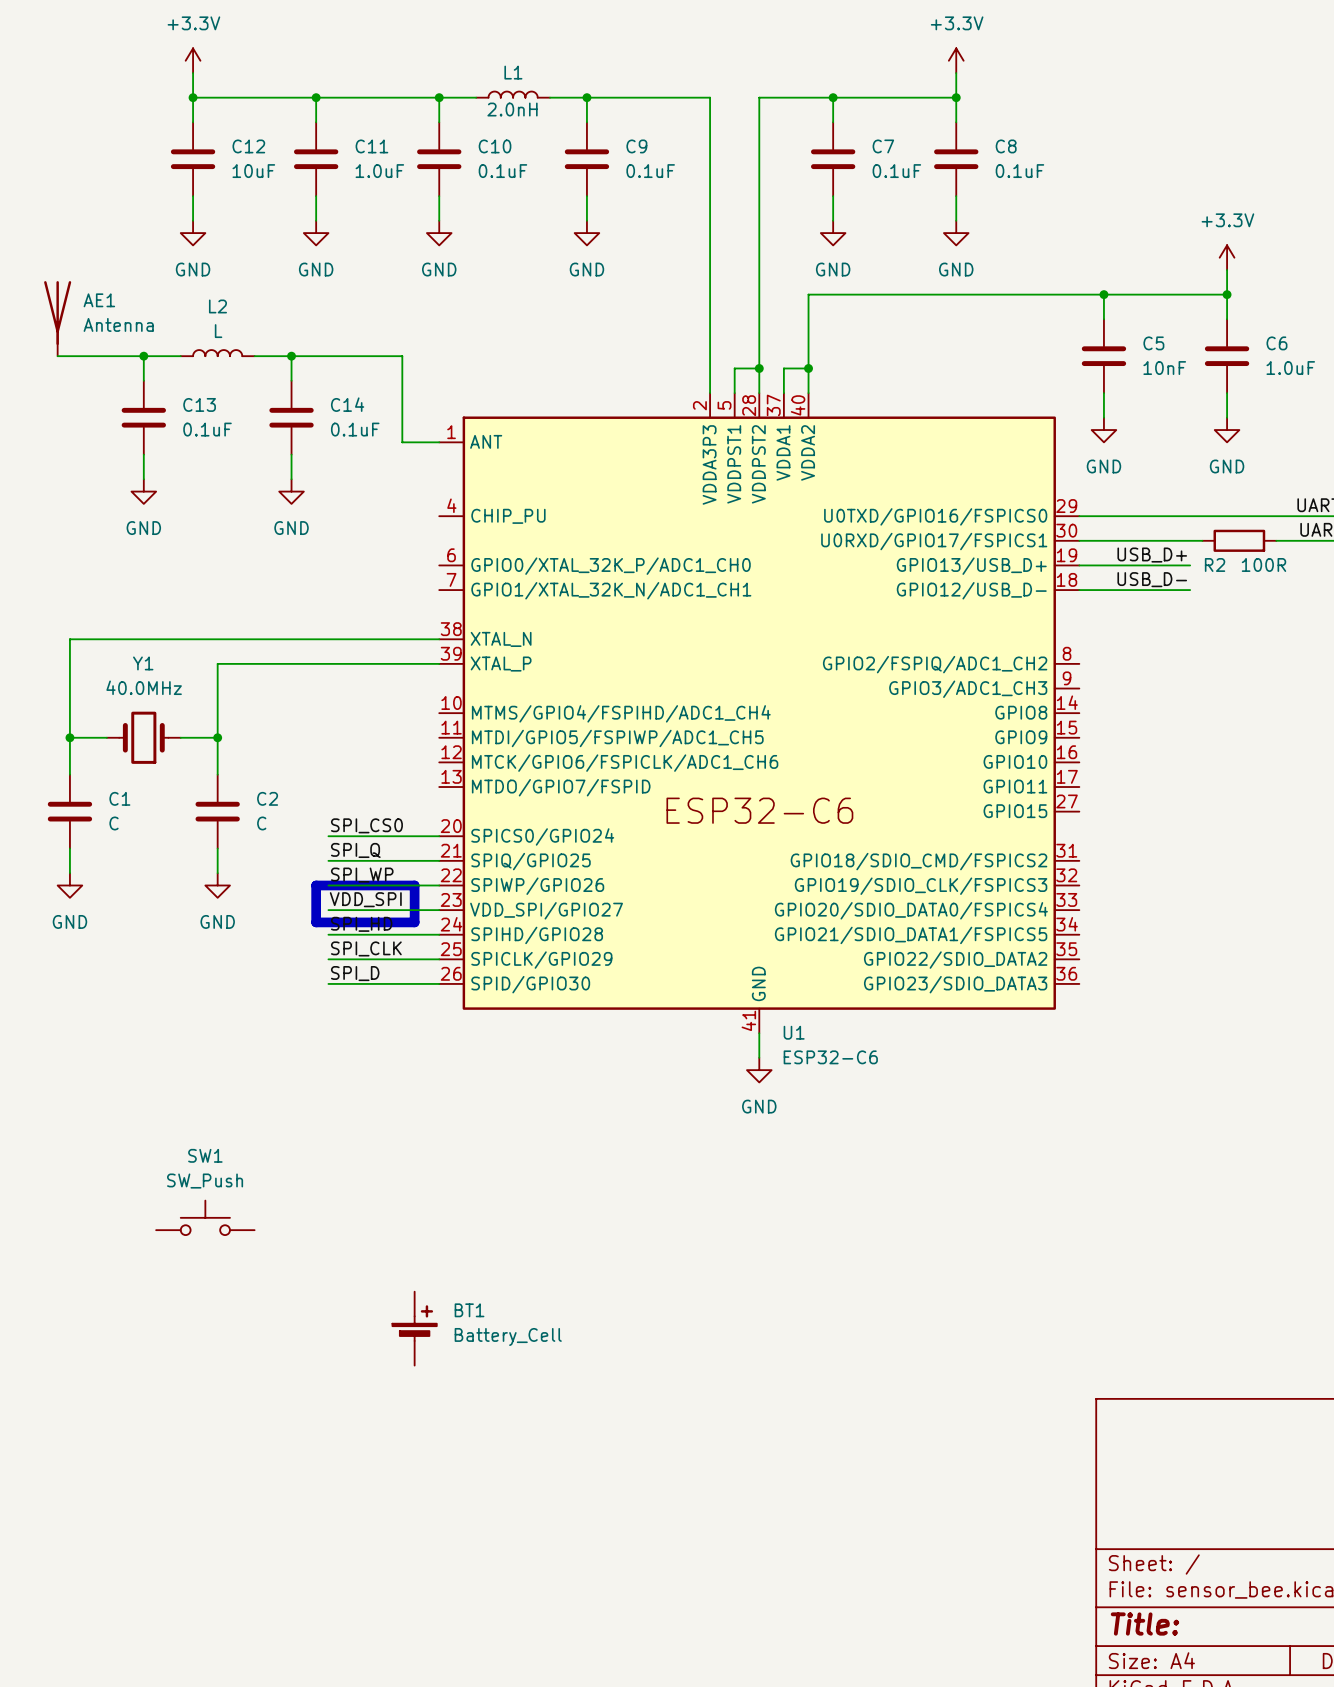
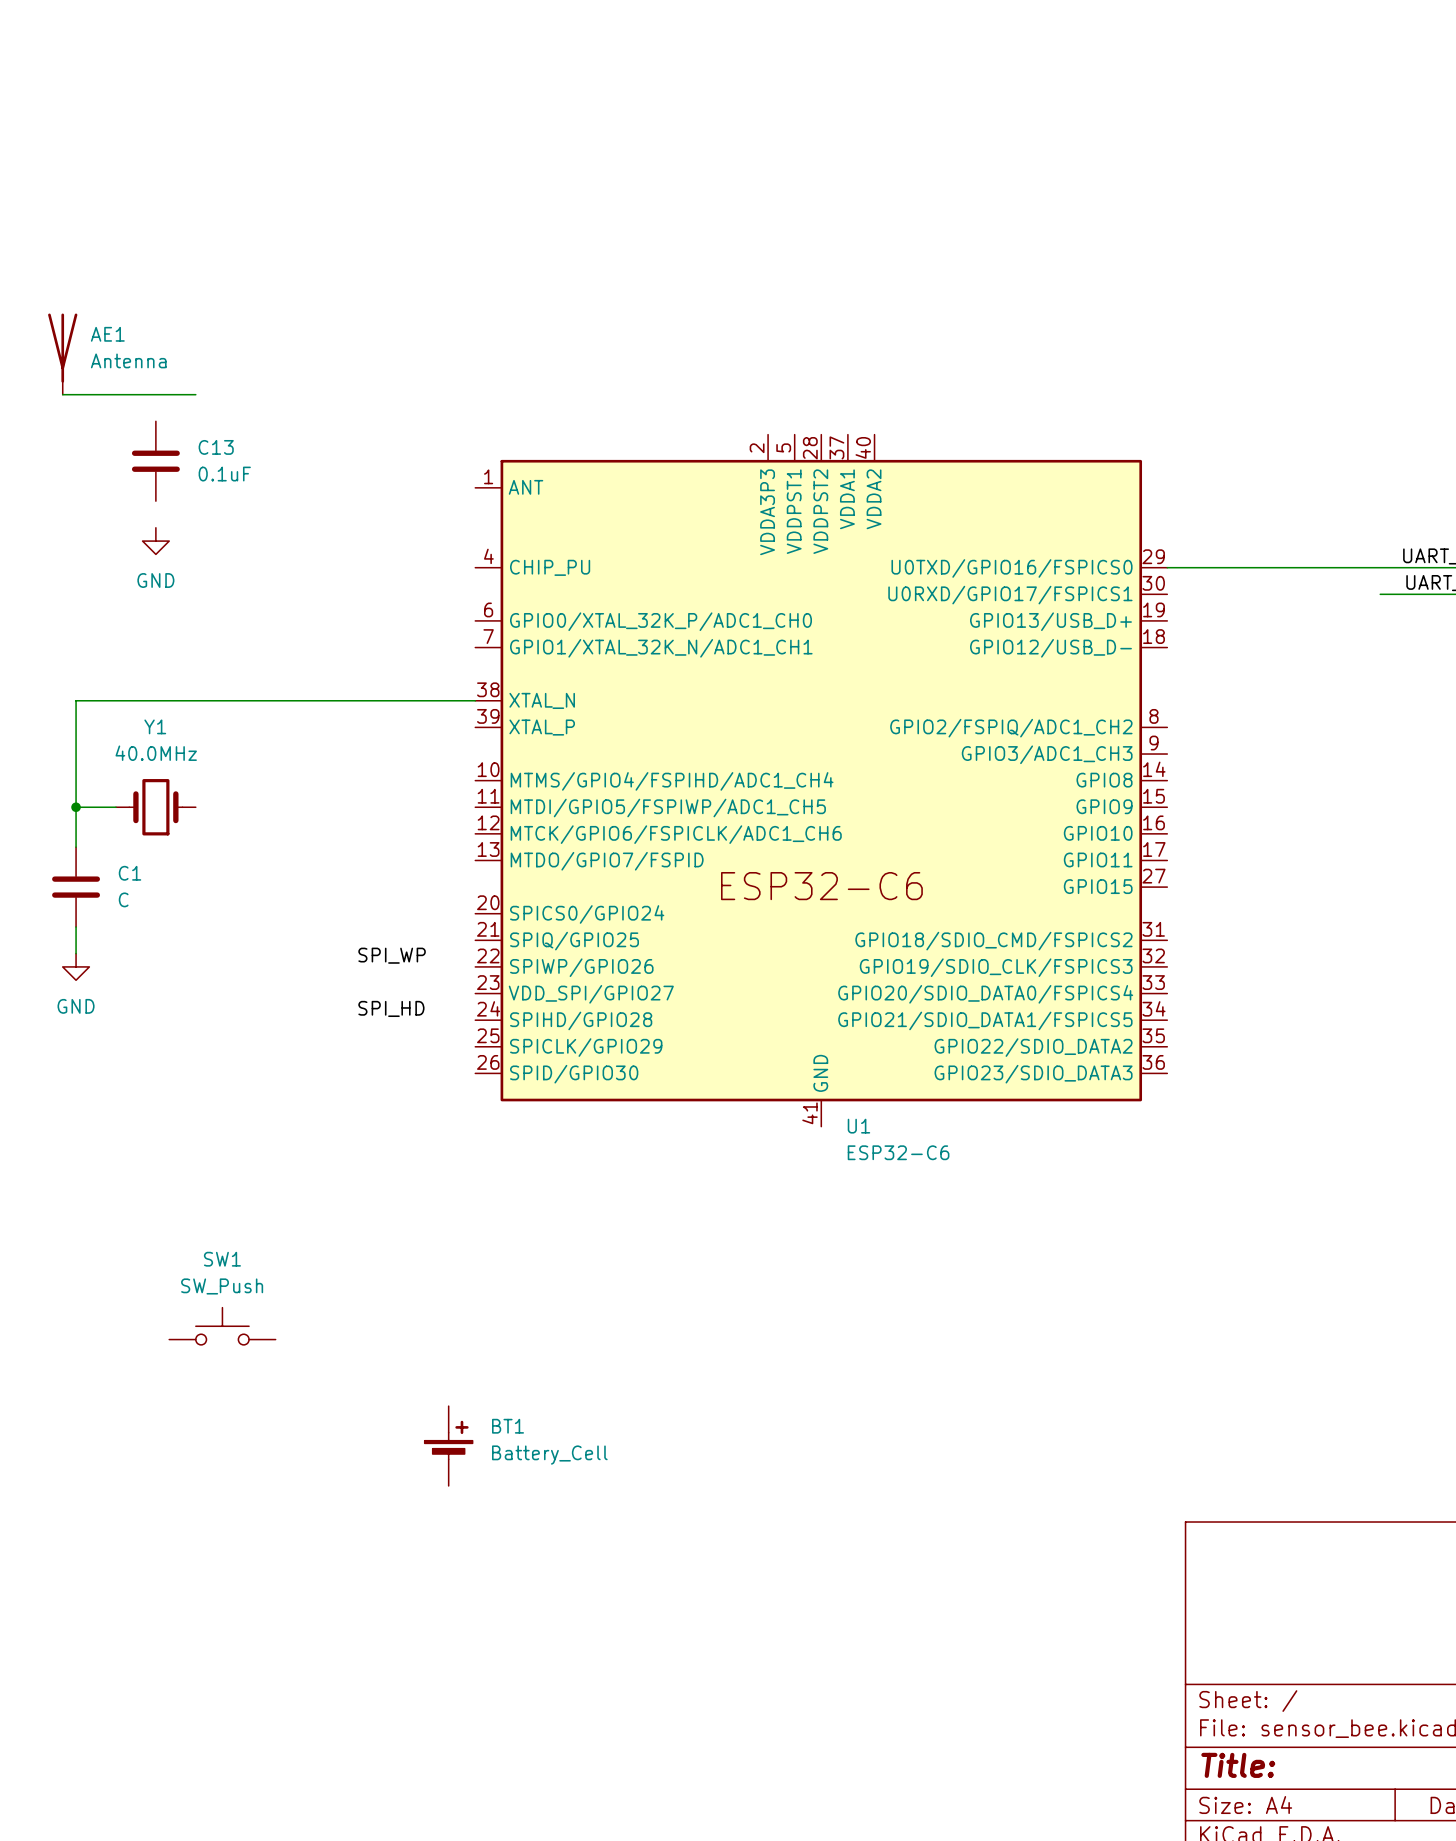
power symbol: +3.3V (193, 60) -> none
power symbol: +3.3V (956, 60) -> none
wire: (193, 73) (193, 122) -> none
wire: (956, 73) (956, 122) -> none
L1: 2.0nH (513, 94) -> none
wire: (193, 97) (476, 97) -> none
junction: (193, 97) -> none
wire: (316, 97) (316, 122) -> none
junction: (316, 97) -> none
wire: (439, 97) (439, 122) -> none
junction: (439, 97) -> none
wire: (550, 97) (710, 97) (710, 393) -> none
wire: (586, 97) (586, 122) -> none
junction: (586, 97) -> none
wire: (833, 97) (833, 122) -> none
junction: (833, 97) -> none
wire: (956, 97) (759, 97) (759, 393) -> none
junction: (956, 97) -> none
C12: 10uF (193, 159) -> none
C11: 1.0uF (316, 159) -> none
C10: 0.1uF (439, 159) -> none
C9: 0.1uF (586, 159) -> none
C7: 0.1uF (833, 159) -> none
C8: 0.1uF (956, 159) -> none
wire: (193, 196) (193, 220) -> none
wire: (316, 196) (316, 220) -> none
wire: (439, 196) (439, 220) -> none
wire: (586, 196) (586, 220) -> none
wire: (833, 196) (833, 220) -> none
wire: (956, 196) (956, 220) -> none
power symbol: GND (193, 233) -> none
power symbol: GND (316, 233) -> none
power symbol: GND (439, 233) -> none
power symbol: GND (586, 233) -> none
power symbol: GND (833, 233) -> none
power symbol: GND (956, 233) -> none
power symbol: +3.3V (1227, 257) -> none
wire: (1227, 270) (1227, 319) -> none
wire: (1103, 294) (1103, 319) -> none
junction: (1103, 294) -> none
wire: (1227, 294) (808, 294) (808, 393) -> none
junction: (1227, 294) -> none
L2: L (217, 353) -> none
wire: (143, 356) (143, 380) -> none
junction: (143, 356) -> none
wire: (254, 356) (402, 356) (402, 442) (439, 442) -> none
wire: (291, 356) (291, 380) -> none
junction: (291, 356) -> none
C5: 10nF (1103, 356) -> none
C6: 1.0uF (1227, 356) -> none
wire: (759, 368) (734, 368) (734, 393) -> none
junction: (759, 368) -> none
wire: (808, 368) (783, 368) (783, 393) -> none
junction: (808, 368) -> none
wire: (1103, 393) (1103, 417) -> none
wire: (1227, 393) (1227, 417) -> none
C14: 0.1uF (291, 417) -> none
power symbol: GND (1103, 430) -> none
power symbol: GND (1227, 430) -> none
wire: (143, 454) (143, 479) -> none
wire: (291, 454) (291, 479) -> none
power symbol: GND (291, 491) -> none
wire: (1079, 540) (1202, 540) -> none
R2: 100R (1239, 540) -> none
label: USB_D+ (1152, 555) -> none
wire: (1079, 565) (1190, 565) -> none
label: USB_D- (1152, 579) -> none
wire: (1079, 590) (1190, 590) -> none
wire: (439, 663) (217, 663) (217, 774) -> none
wire: (180, 737) (217, 737) -> none
junction: (217, 737) -> none
C2: C (217, 811) -> none
label: SPI_CS0 (366, 825) -> none
wire: (328, 836) (439, 836) -> none
wire: (217, 848) (217, 873) -> none
label: SPI_Q (355, 850) -> none
wire: (328, 860) (439, 860) -> none
power symbol: GND (217, 885) -> none
line: (316, 885) (414, 885) (414, 922) (316, 922) (316, 885) -> none
wire: (328, 885) (439, 885) -> none
label: VDD_SPI (365, 899) -> none
wire: (328, 910) (439, 910) -> none
wire: (328, 934) (439, 934) -> none
label: SPI_CLK (366, 948) -> none
wire: (328, 959) (439, 959) -> none
label: SPI_D (355, 973) -> none
wire: (328, 983) (439, 983) -> none
wire: (759, 1033) (759, 1057) -> none
power symbol: GND (759, 1070) -> none

